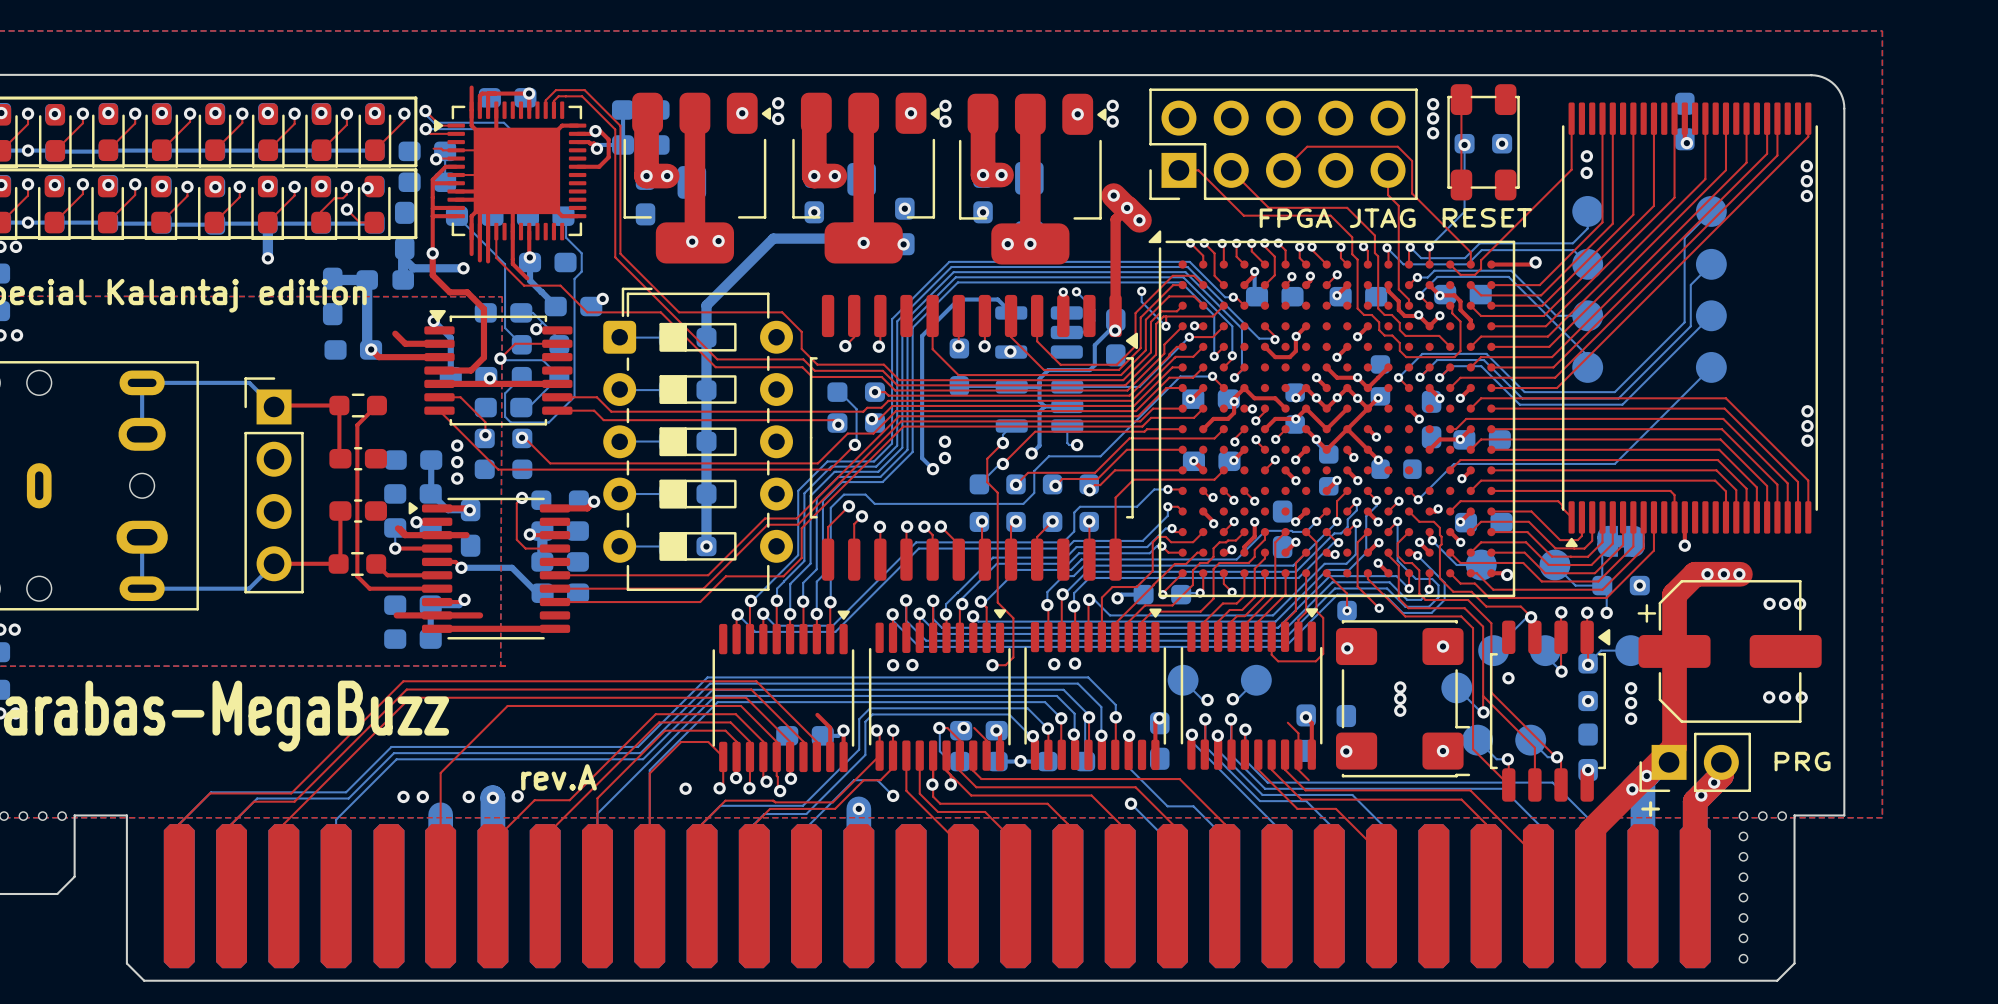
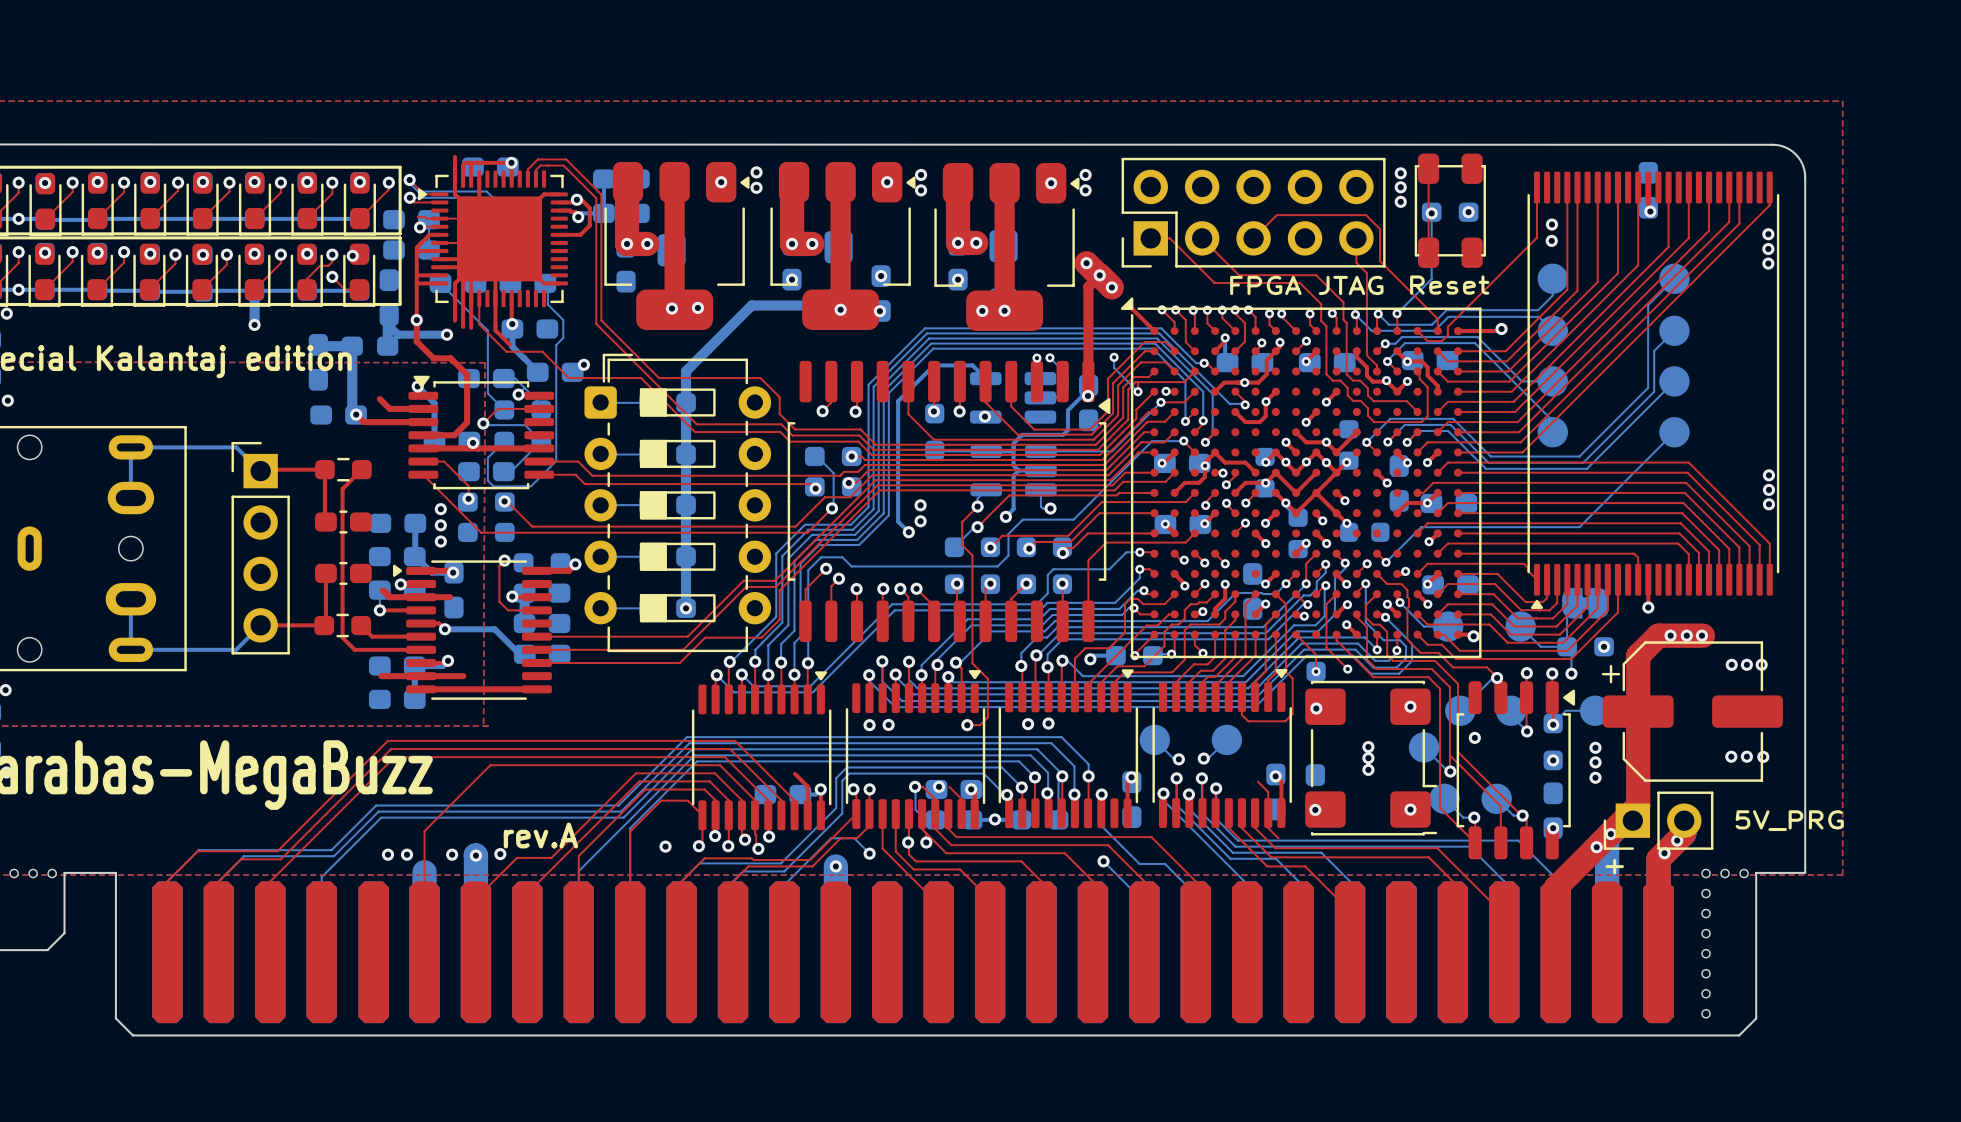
part value: RESET (1487, 217) -> Reset (1449, 285)
top track: none -> (1129, 306) (1154, 331)
top track: none -> (1275, 351) (1266, 360) (1266, 374) (1258, 382) (1224, 382) (1215, 391)
via: none -> (1244, 382)
part value: PRG (1802, 761) -> 5V_PRG (1789, 820)

